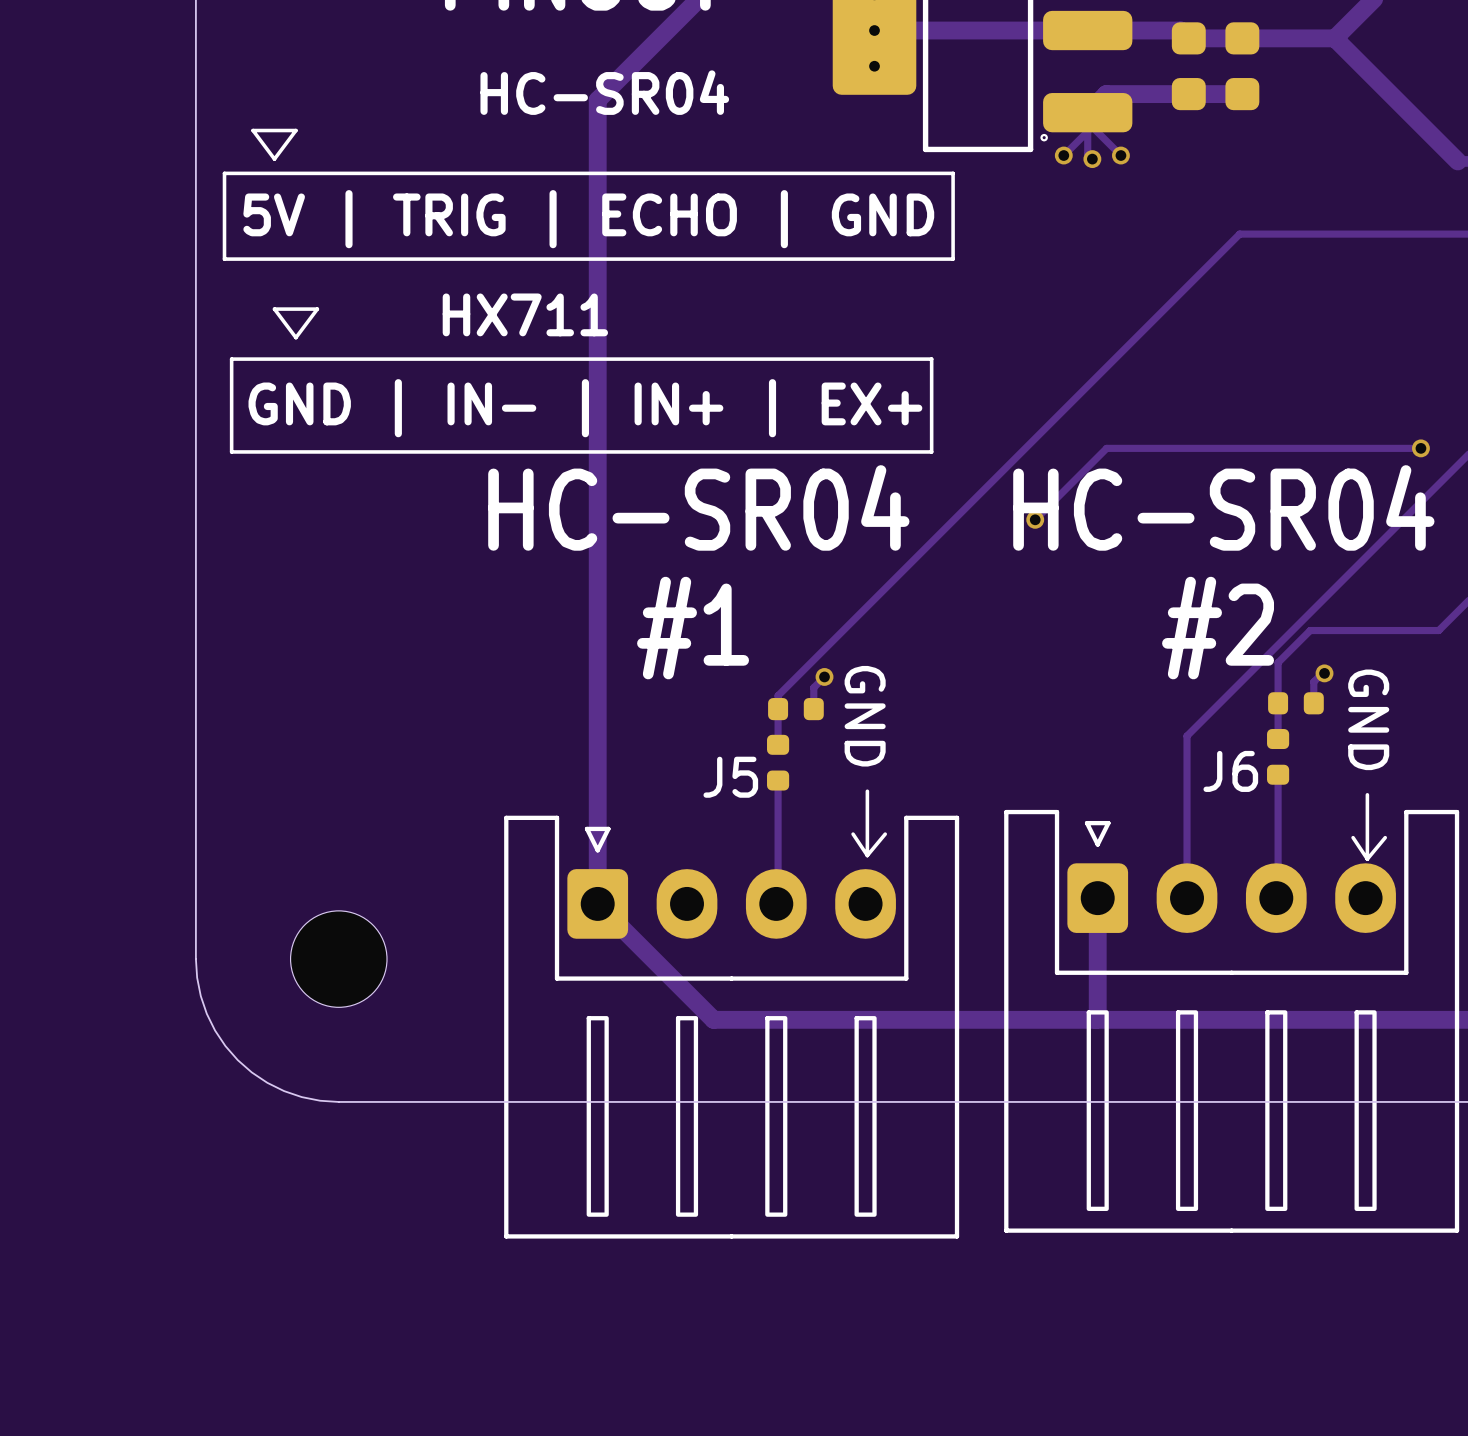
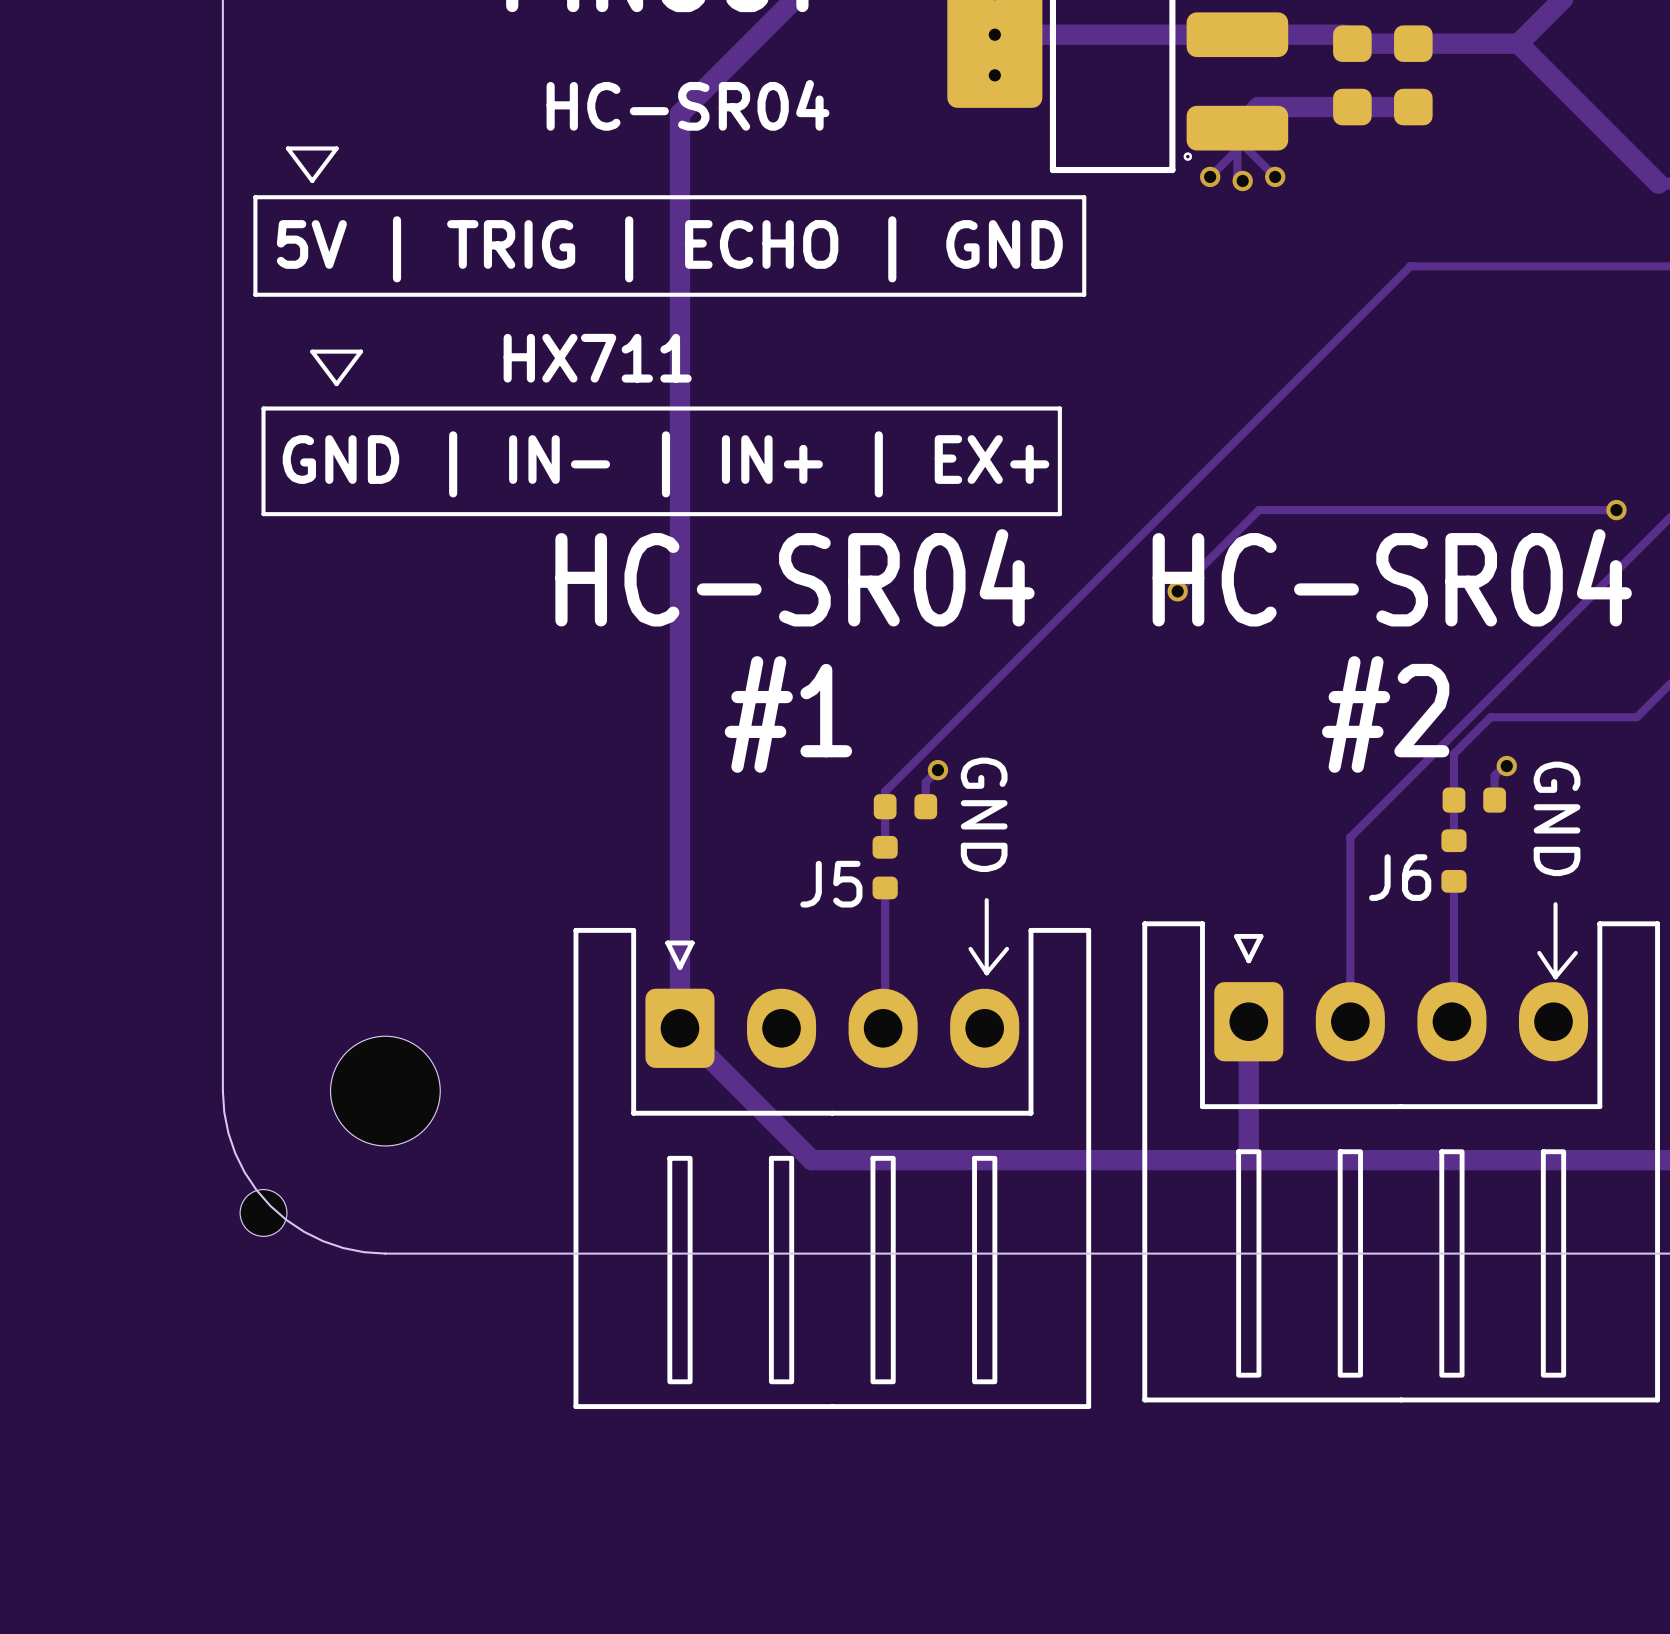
part: none -> (263, 1212)

